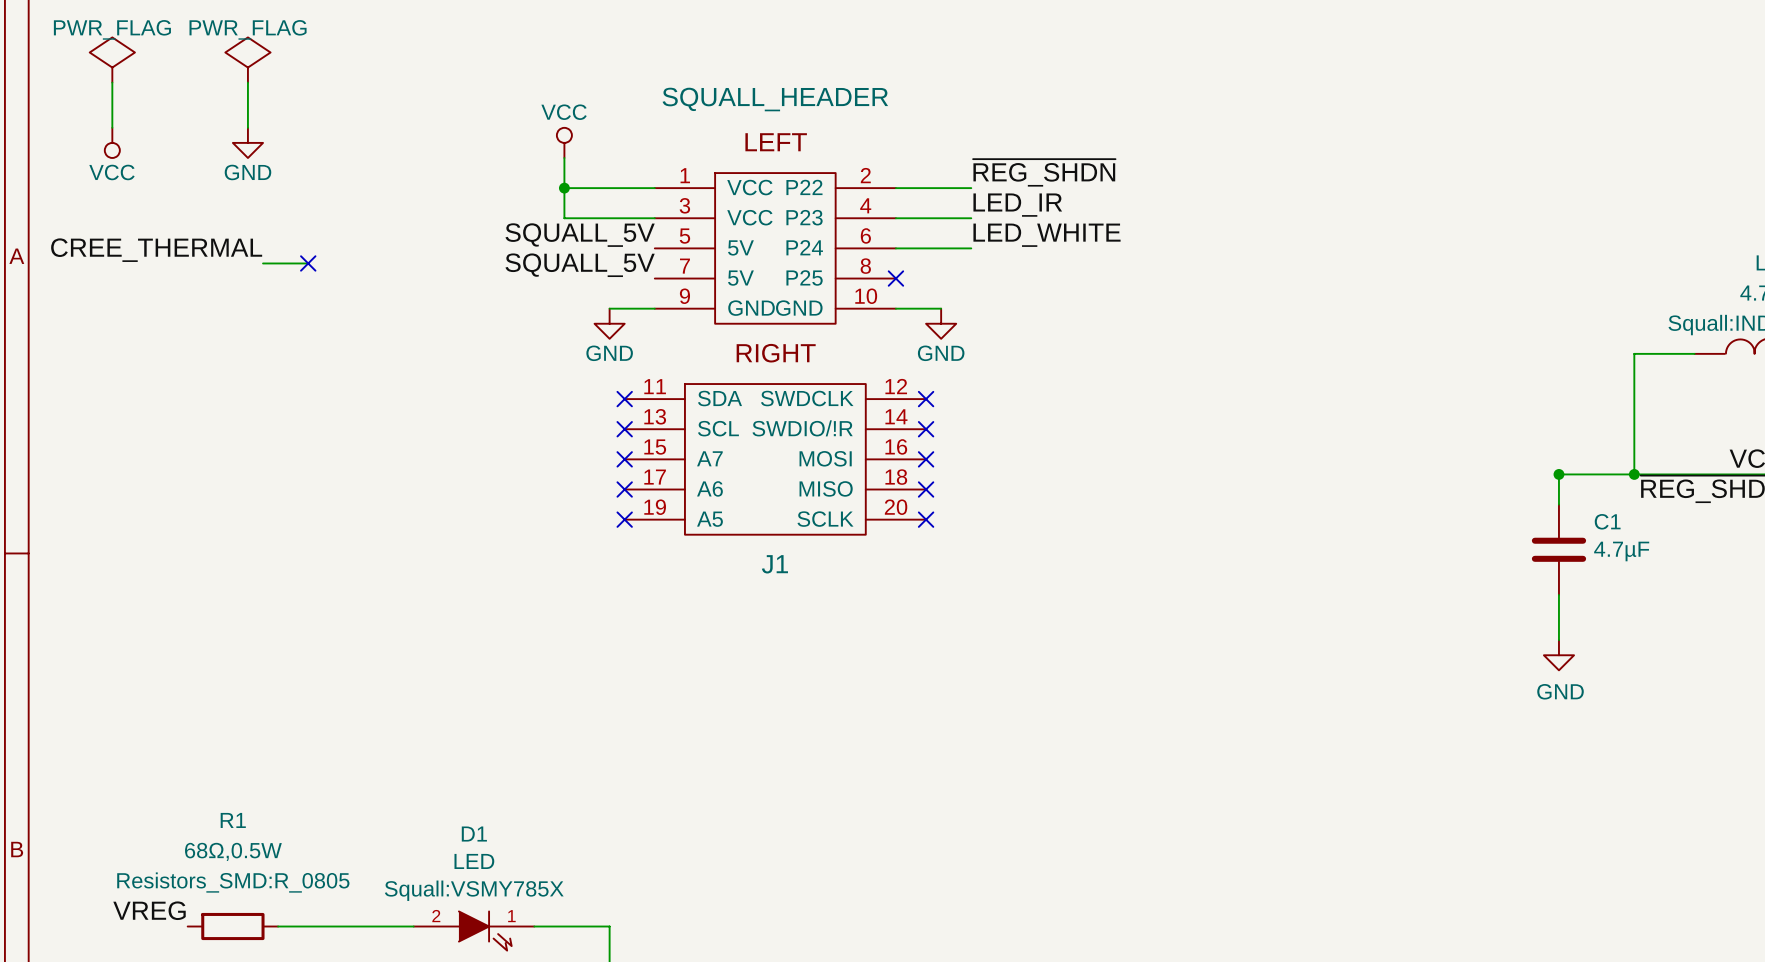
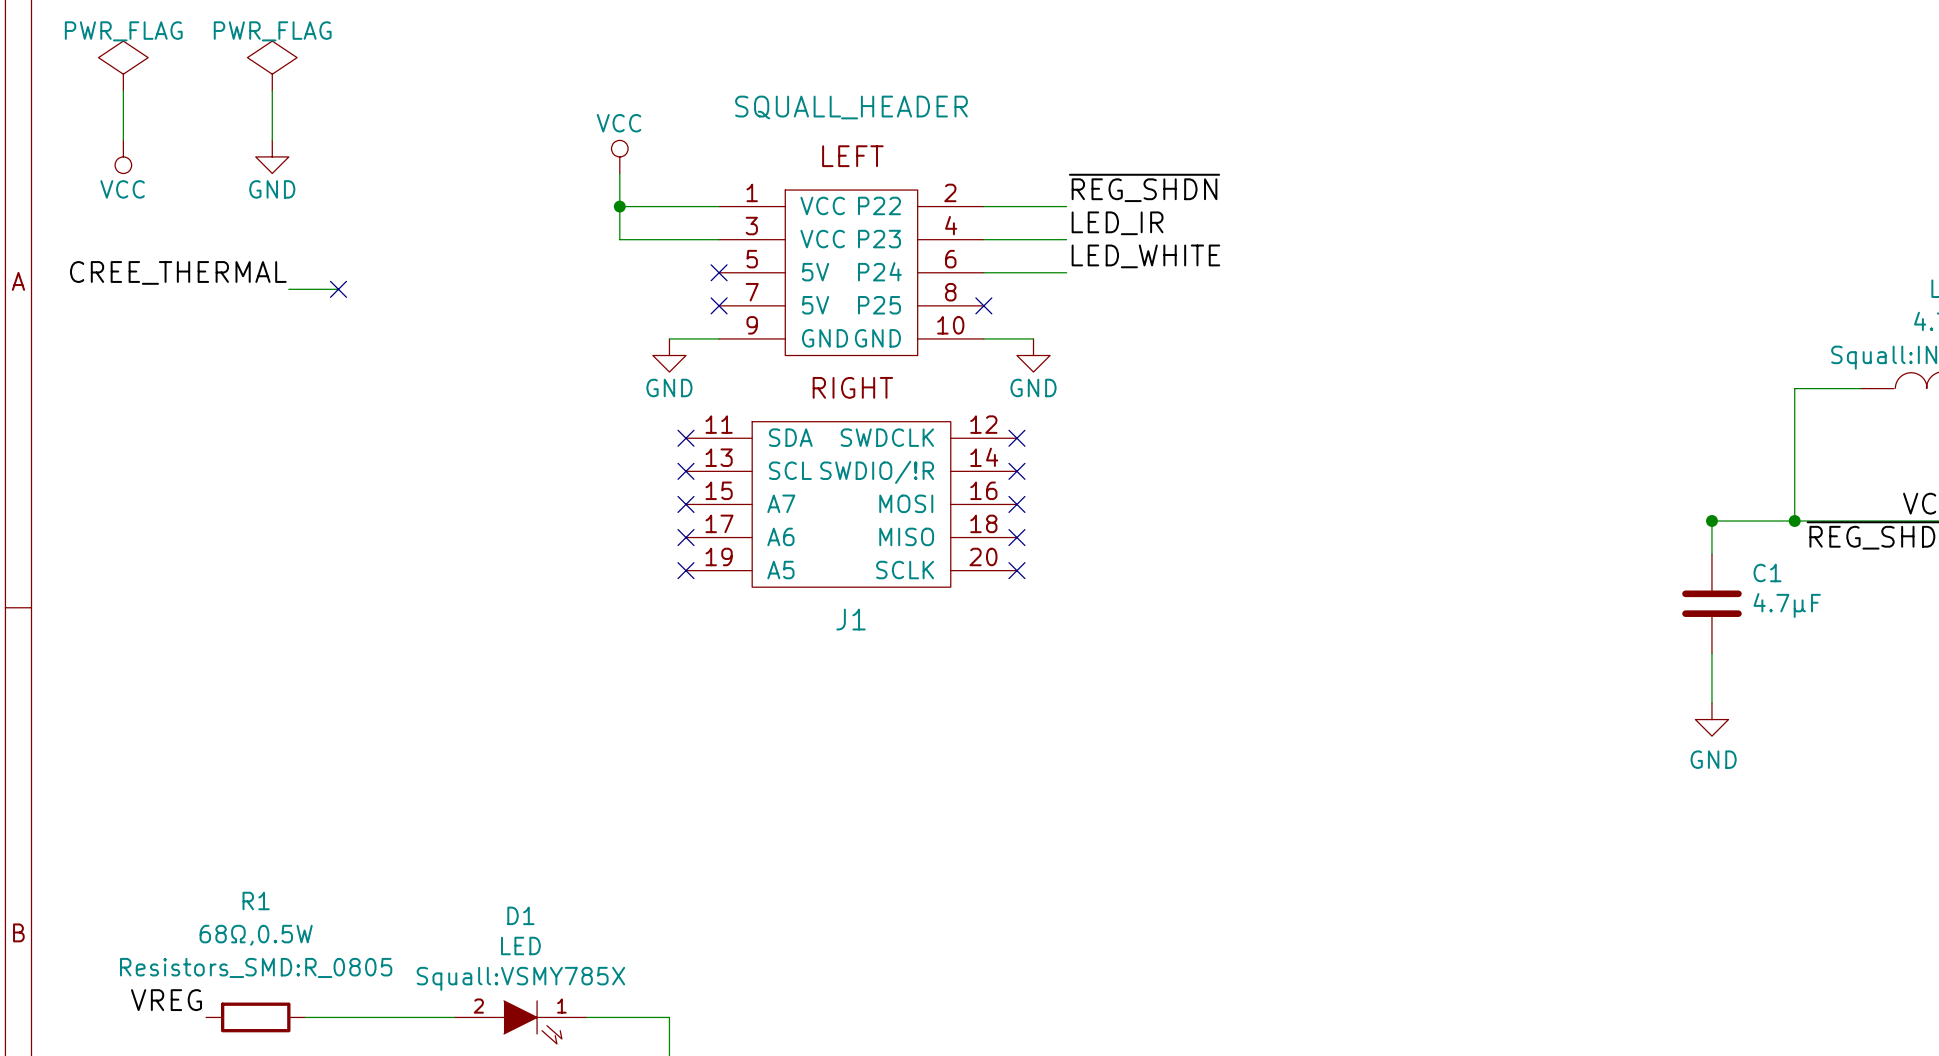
label: SQUALL_5V (580, 235) -> none
no-connect mark: none -> (719, 272)
label: SQUALL_5V (580, 265) -> none
no-connect mark: none -> (719, 305)

